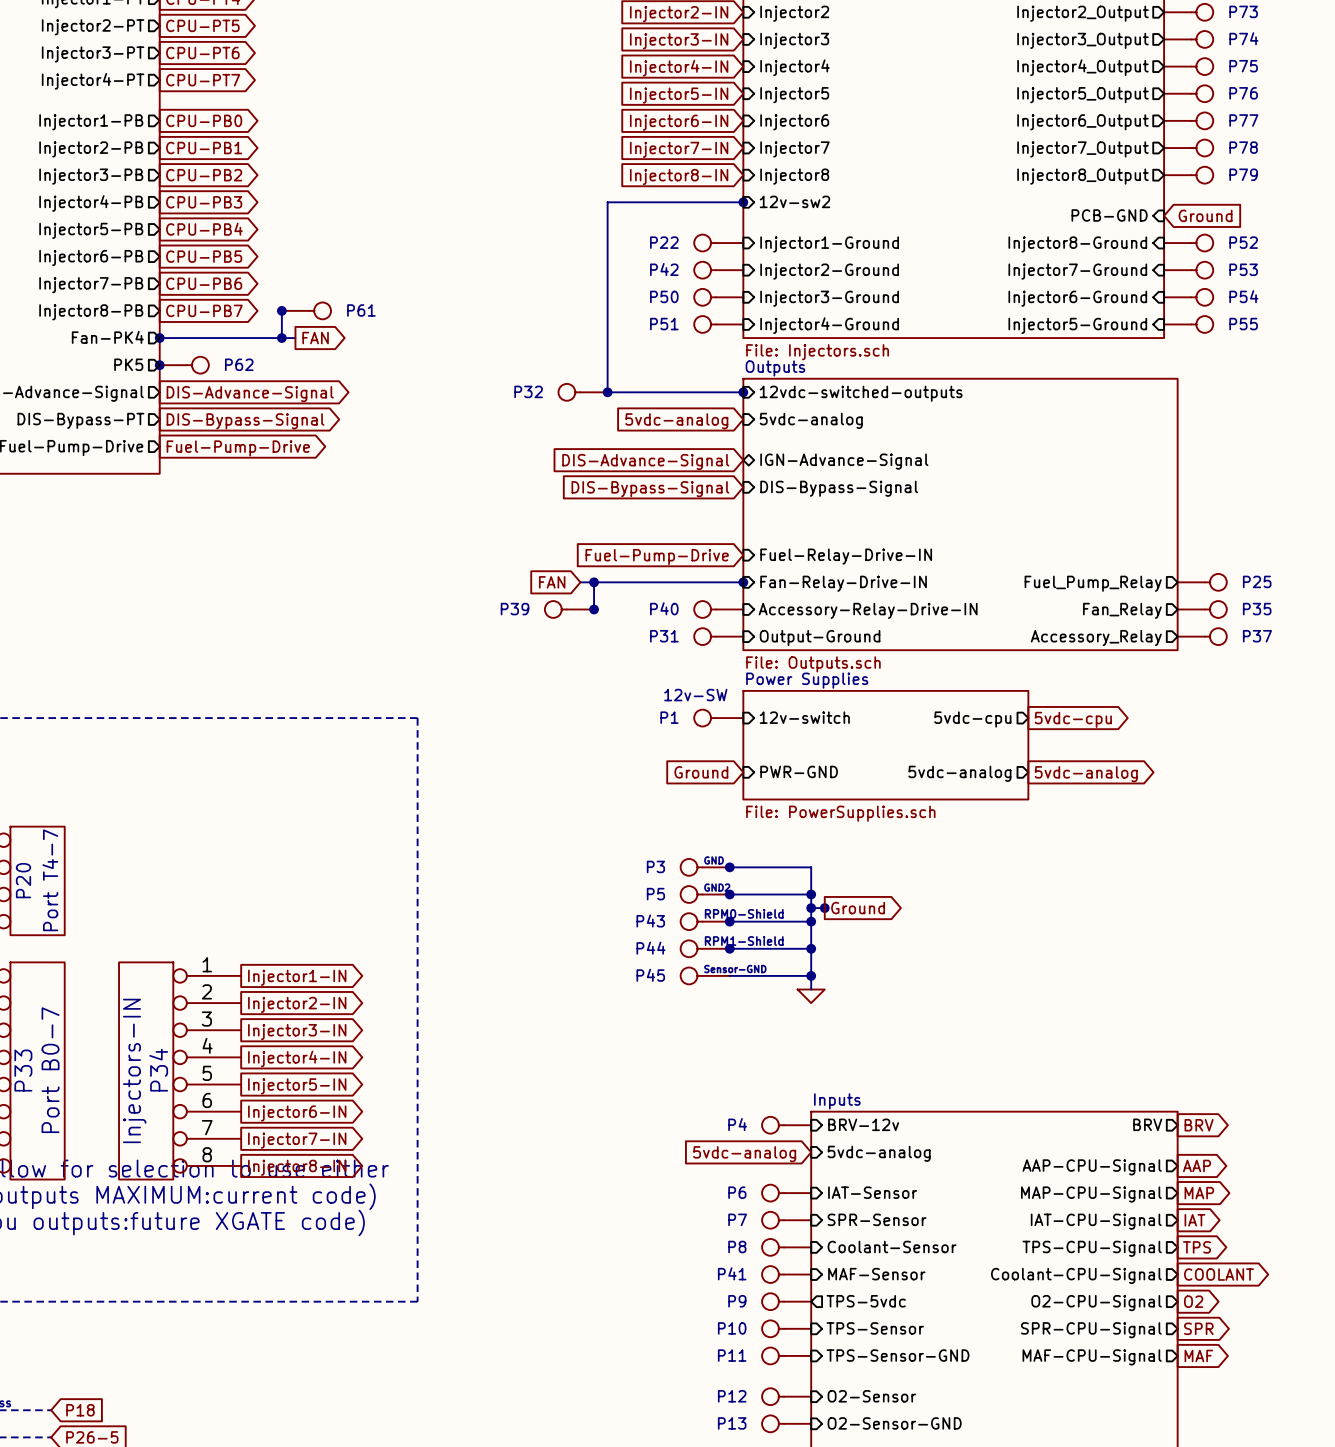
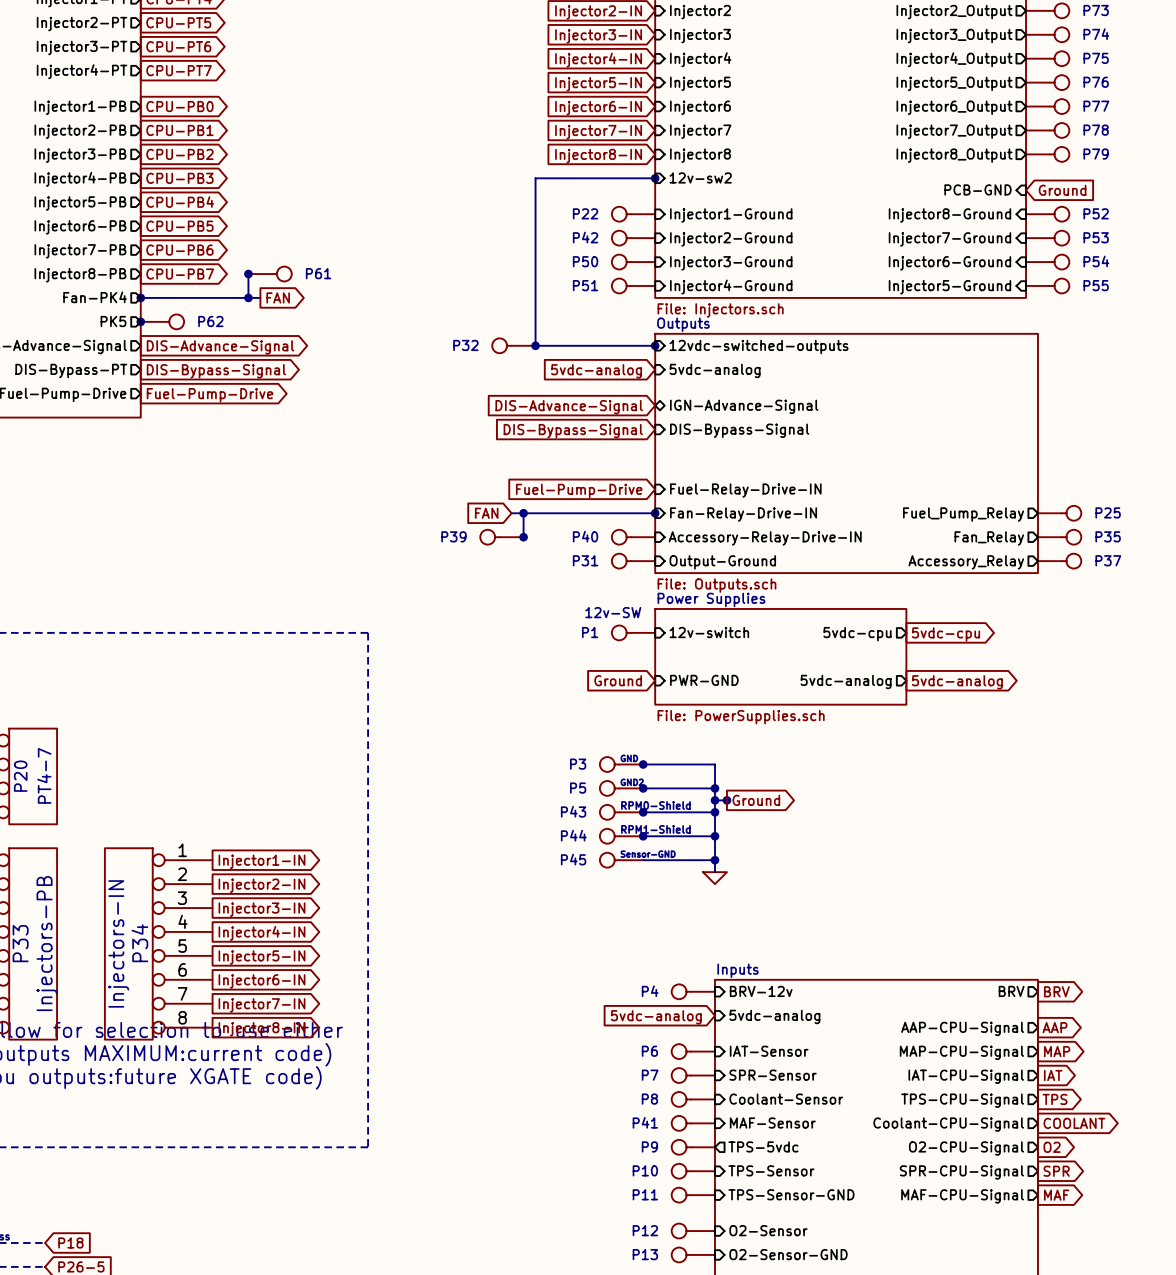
P20 value: Port T4-7 (50, 880) -> PT4-7 (44, 775)
P33 value: Port B0-7 (50, 1070) -> Injectors-PB (46, 943)

